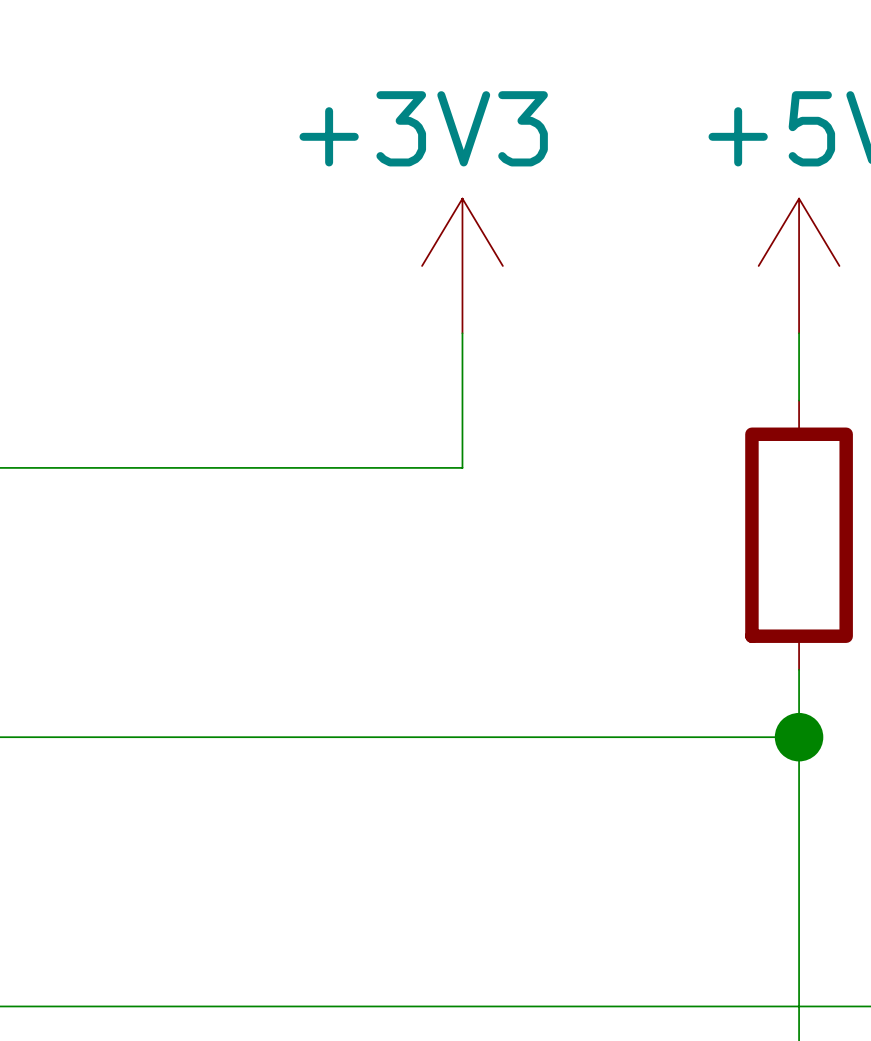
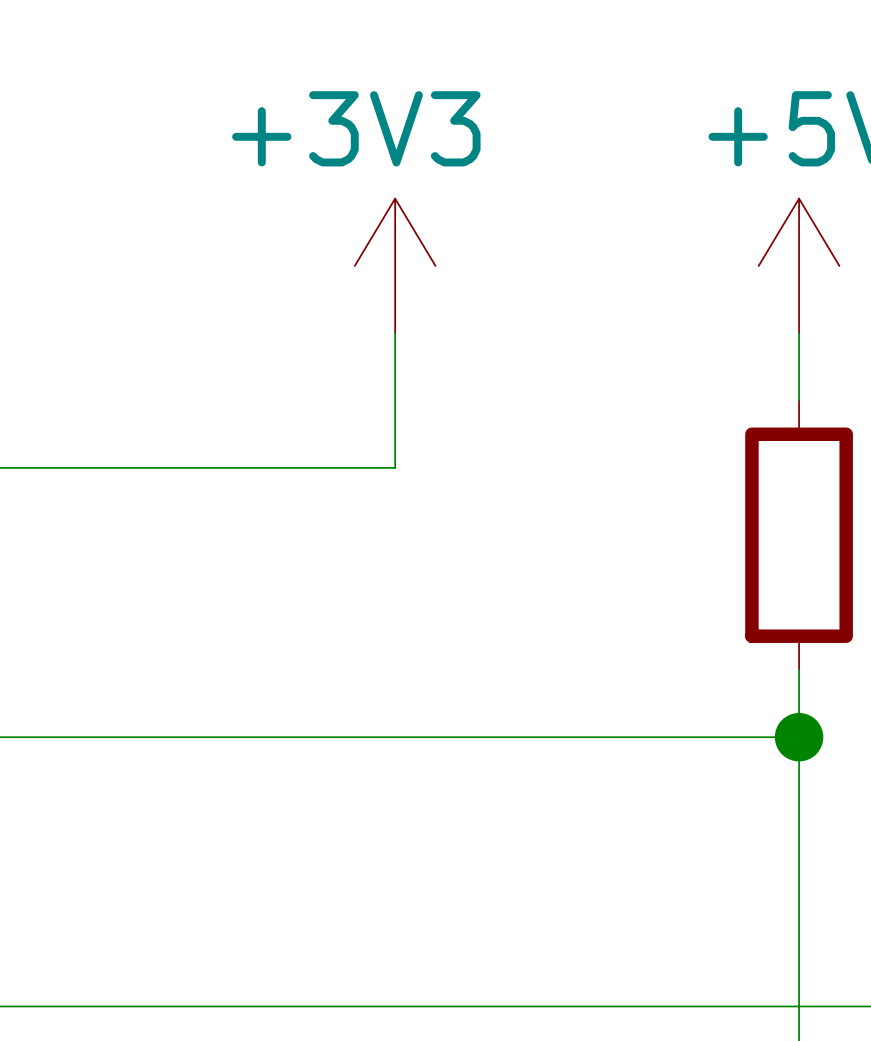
power symbol position: +3V3 (462, 265) -> +3V3 (395, 265)
wire: (462, 333) (462, 467) (395, 467) -> (395, 333) (395, 467)

